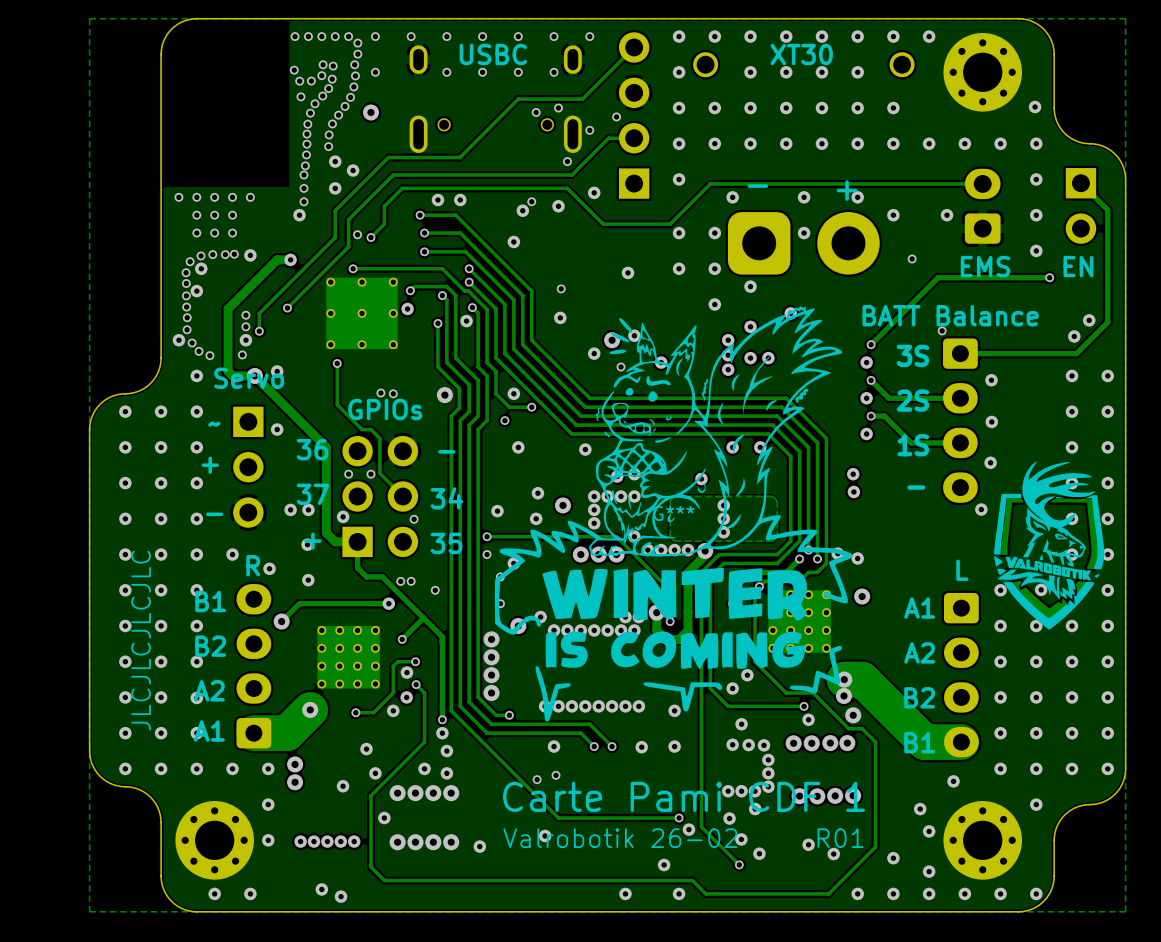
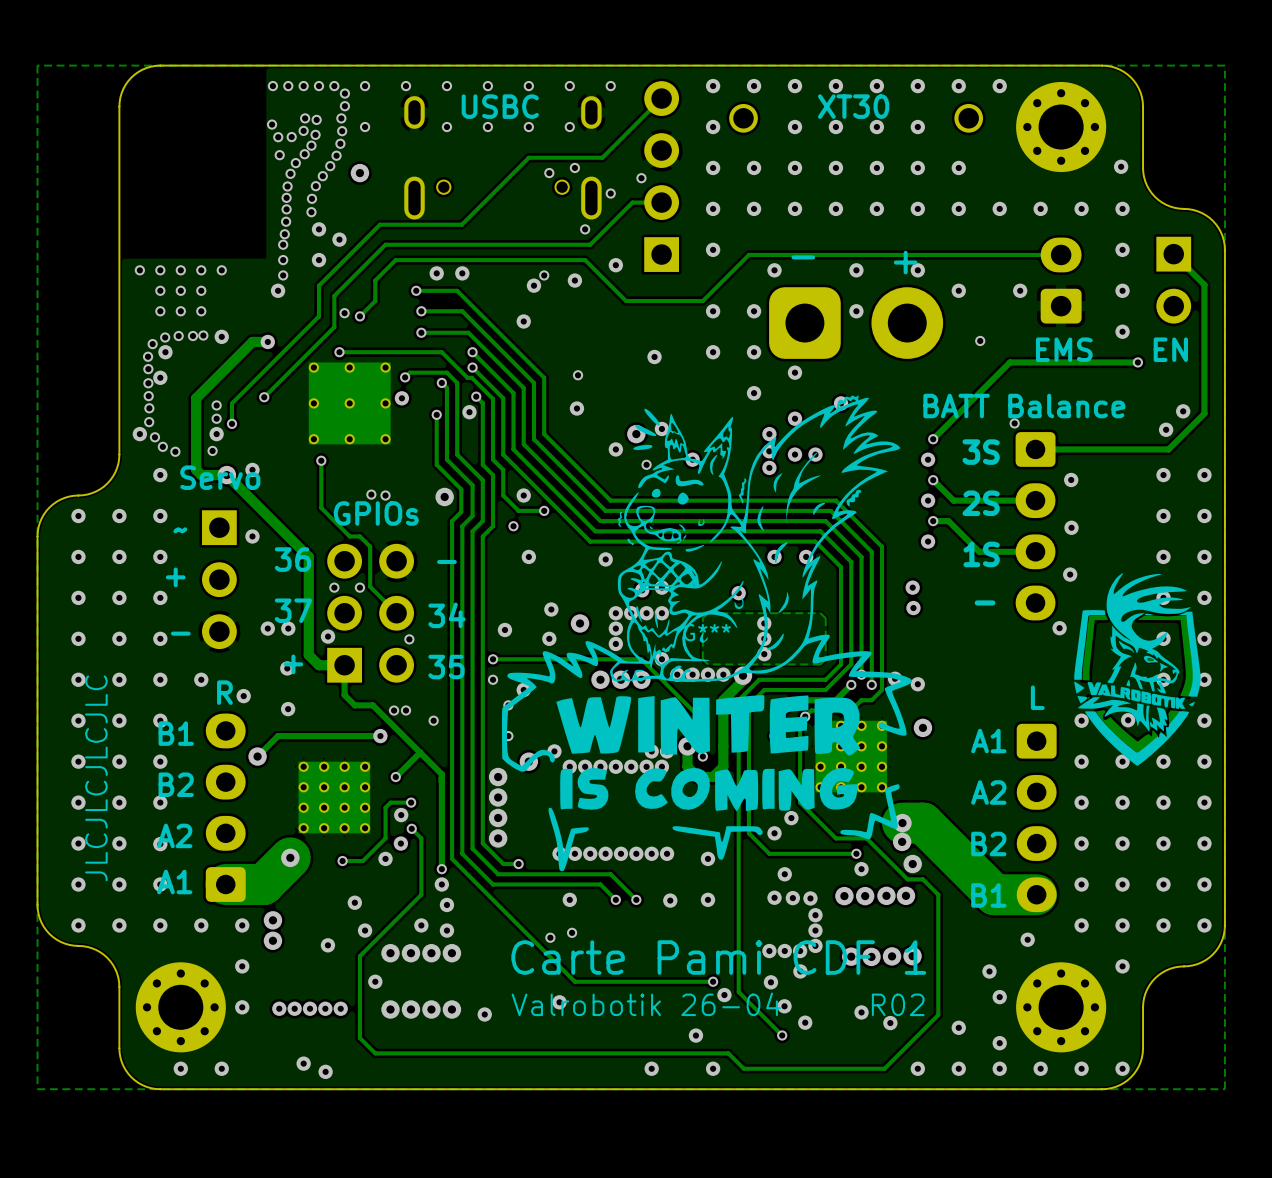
text: Valrobotik 26-02 (620, 838) -> Valrobotik 26-04 (646, 1004)
text: R01 (840, 838) -> R02 (898, 1004)

